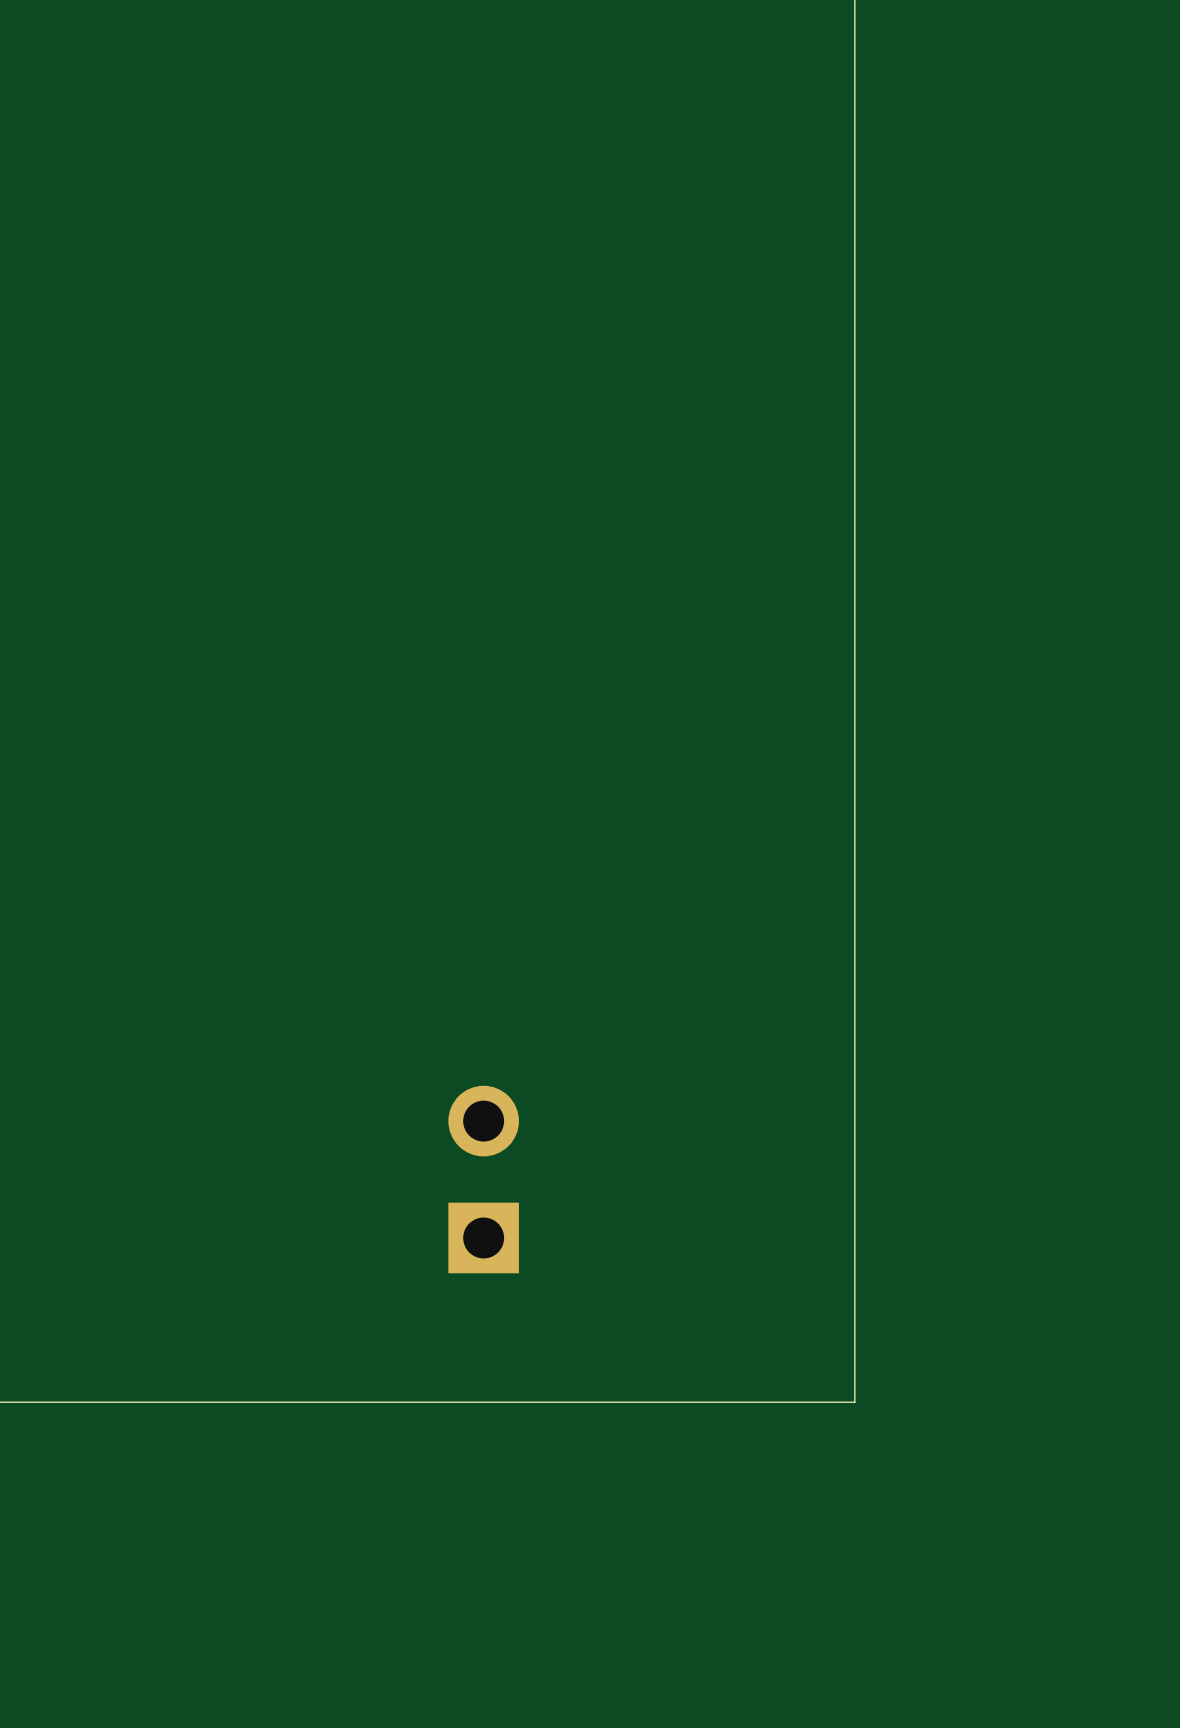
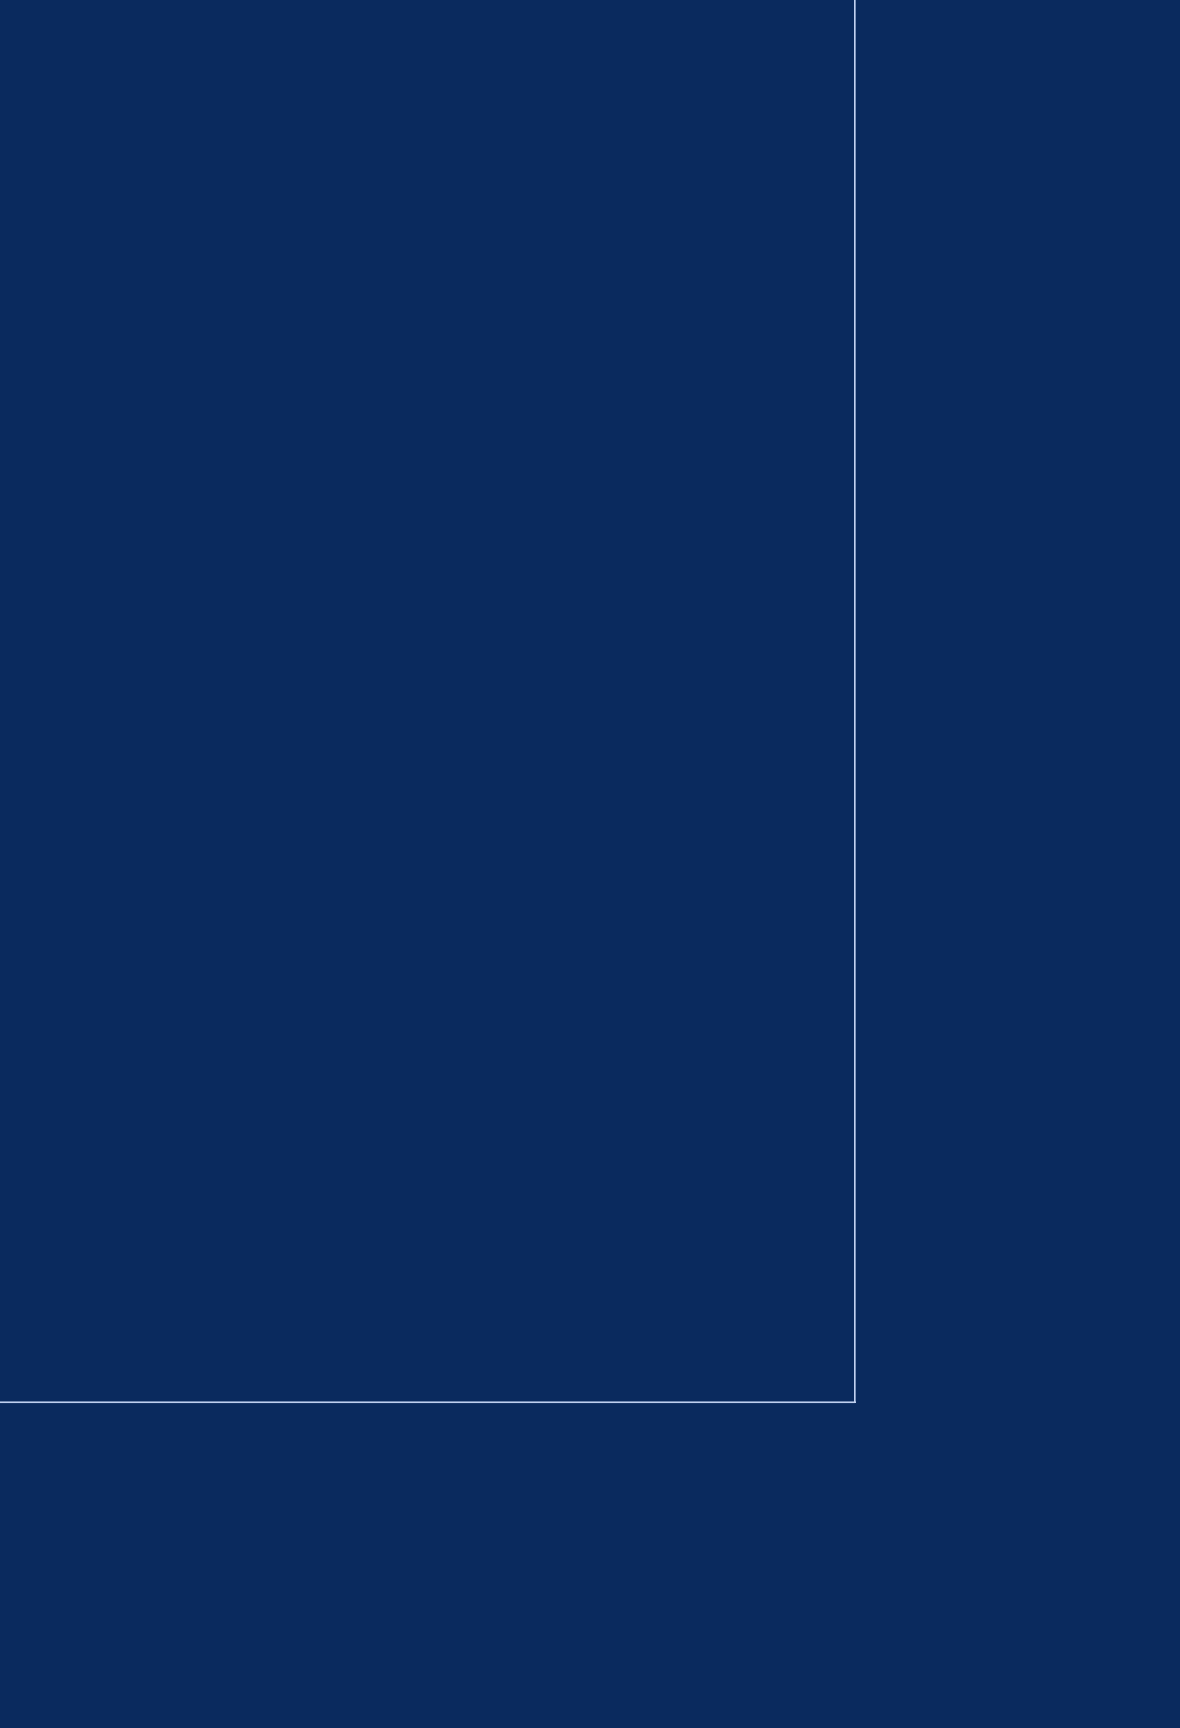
part: (483, 1179) -> none

